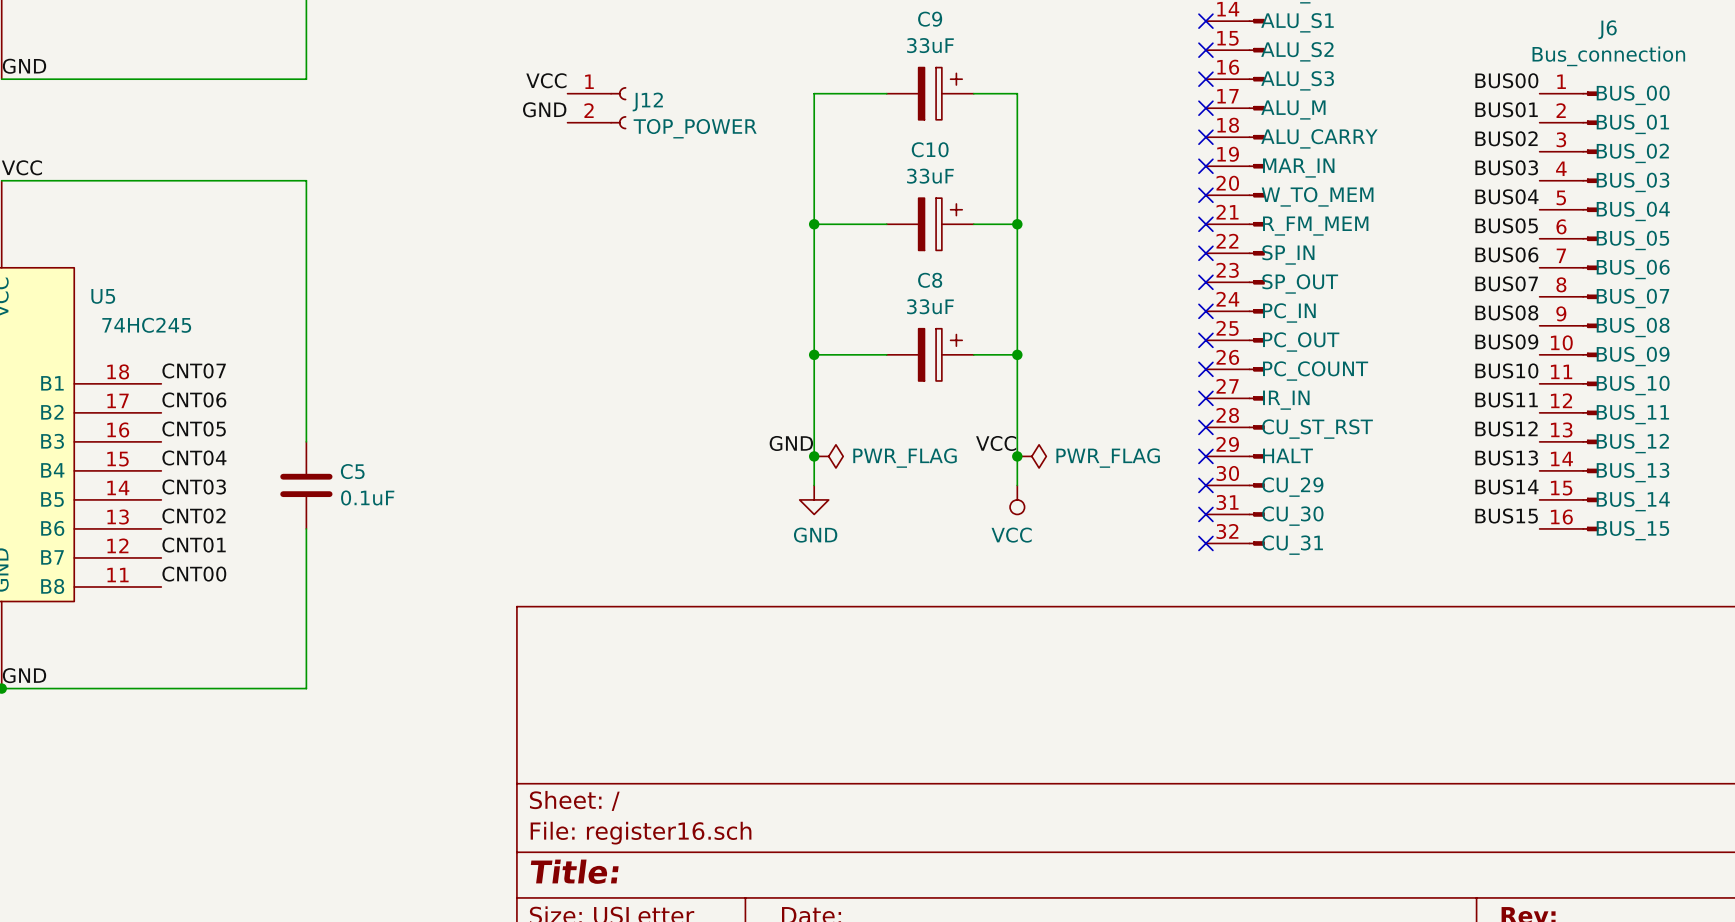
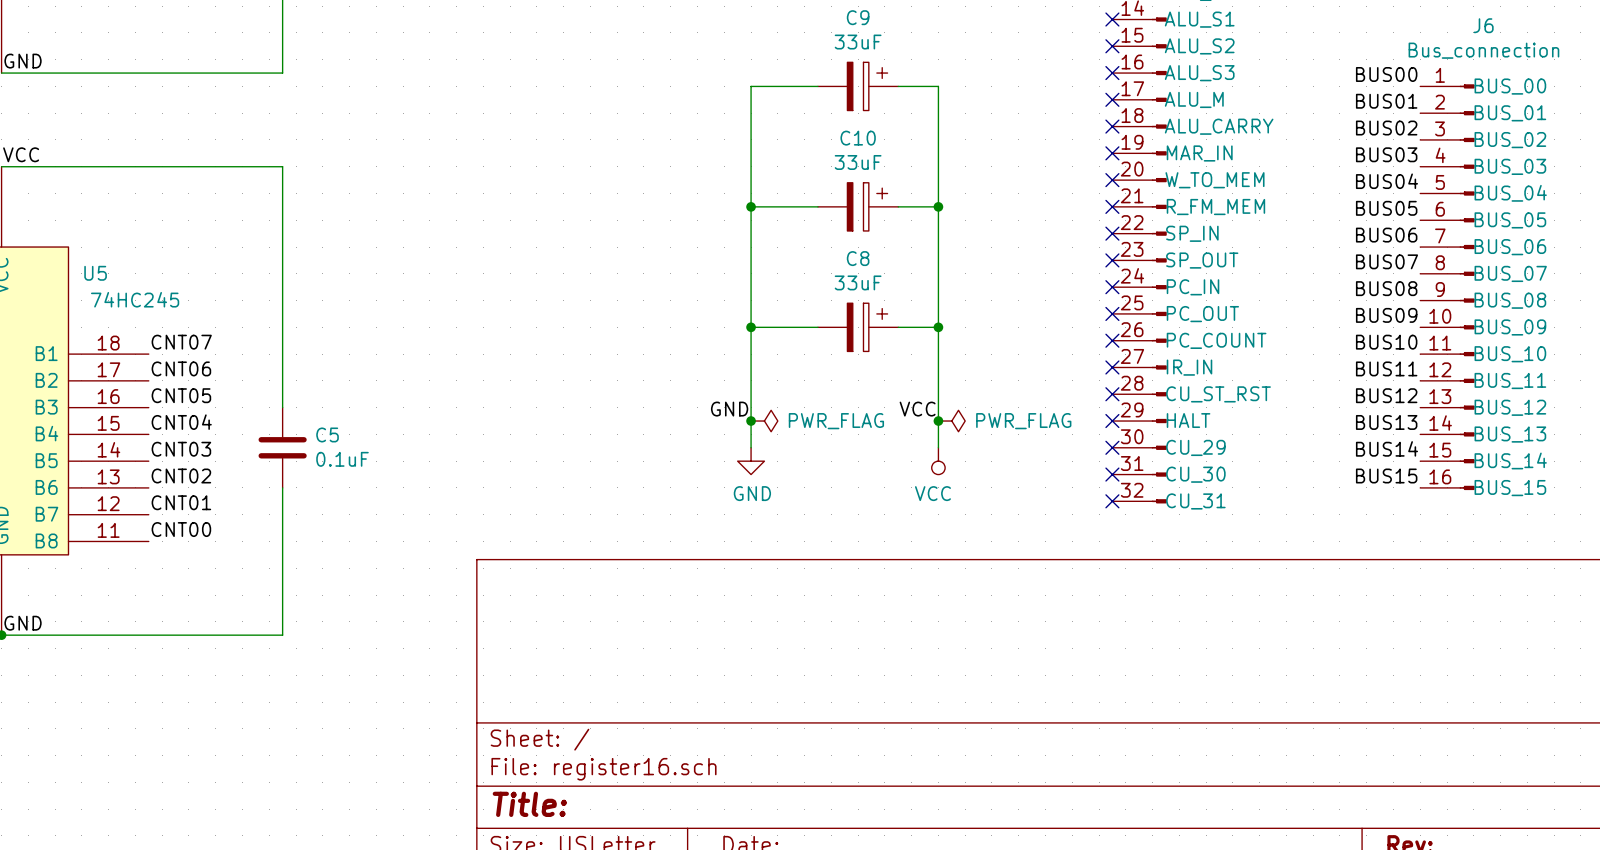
label: VCC (546, 80) -> none
J12: TOP_POWER (596, 108) -> none
label: GND (544, 109) -> none

